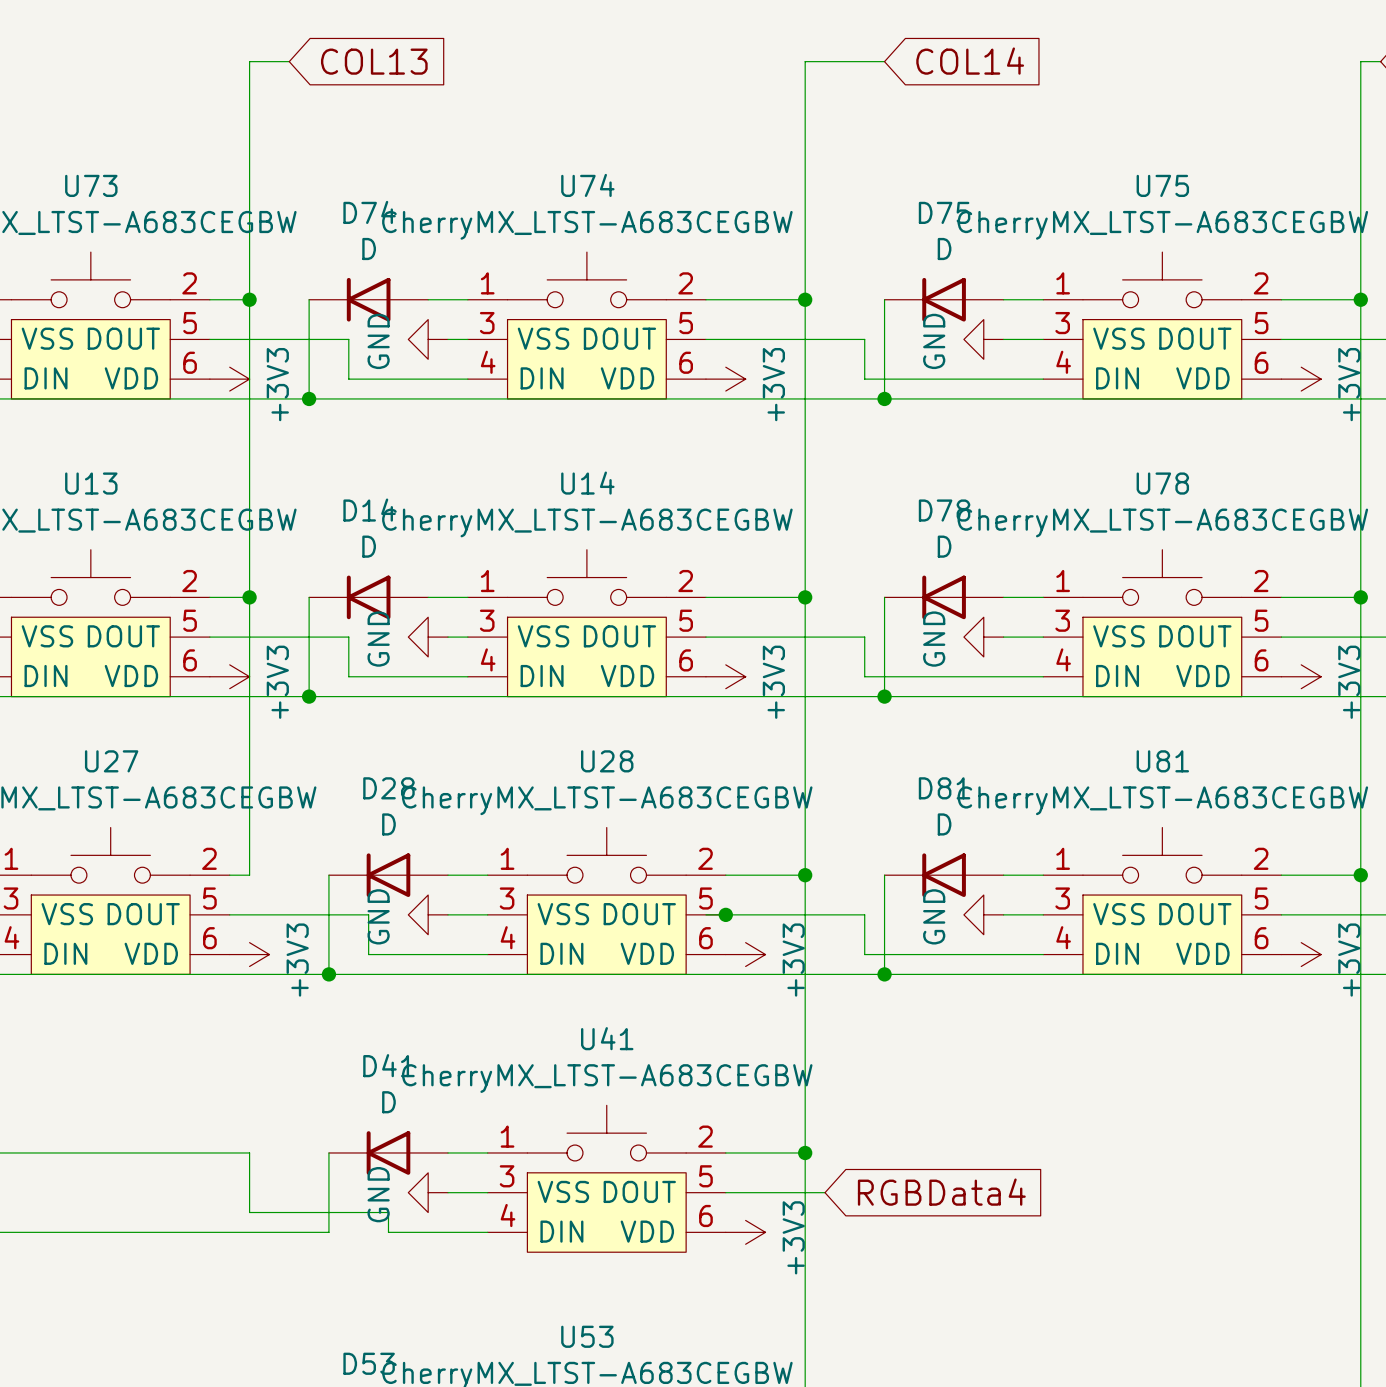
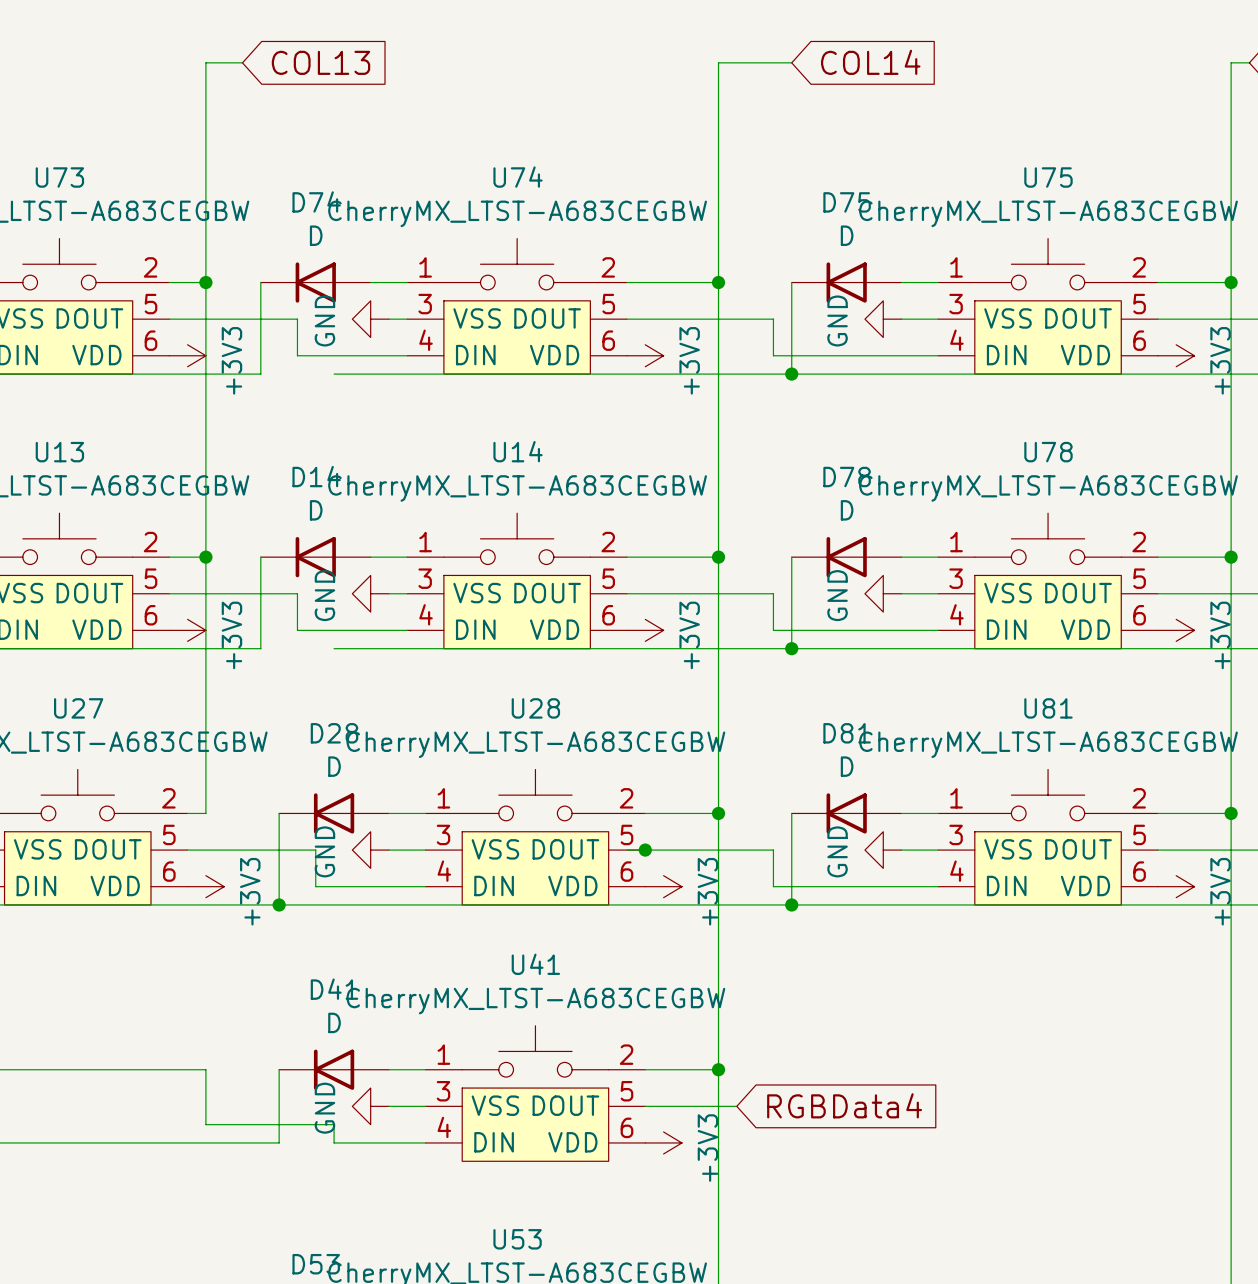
wire: (309, 398) (388, 398) -> none
junction: (309, 398) -> none
wire: (309, 696) (388, 696) -> none
junction: (309, 696) -> none

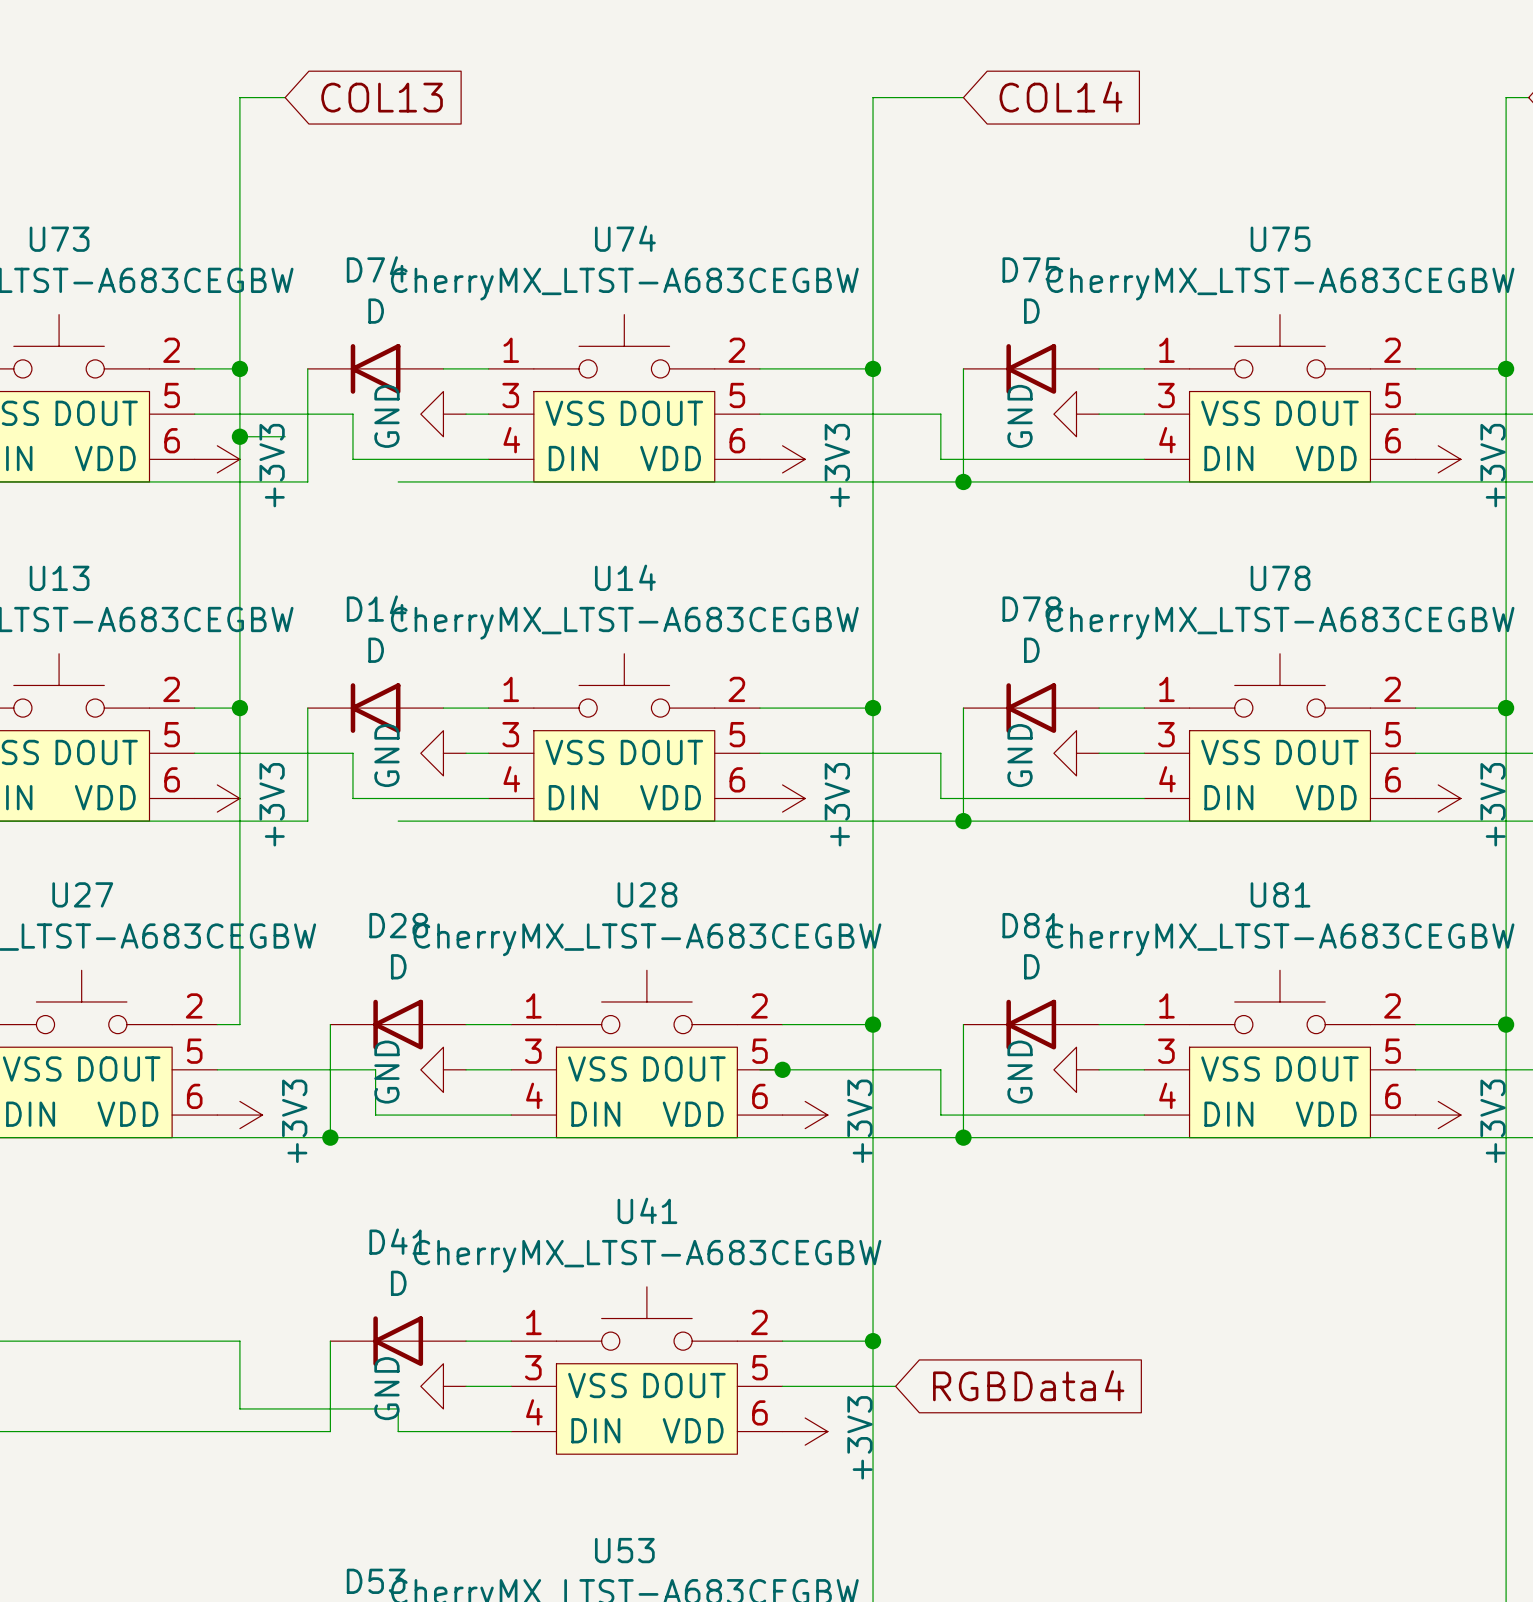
wire: none -> (239, 436) (285, 436)
junction: none -> (239, 436)

